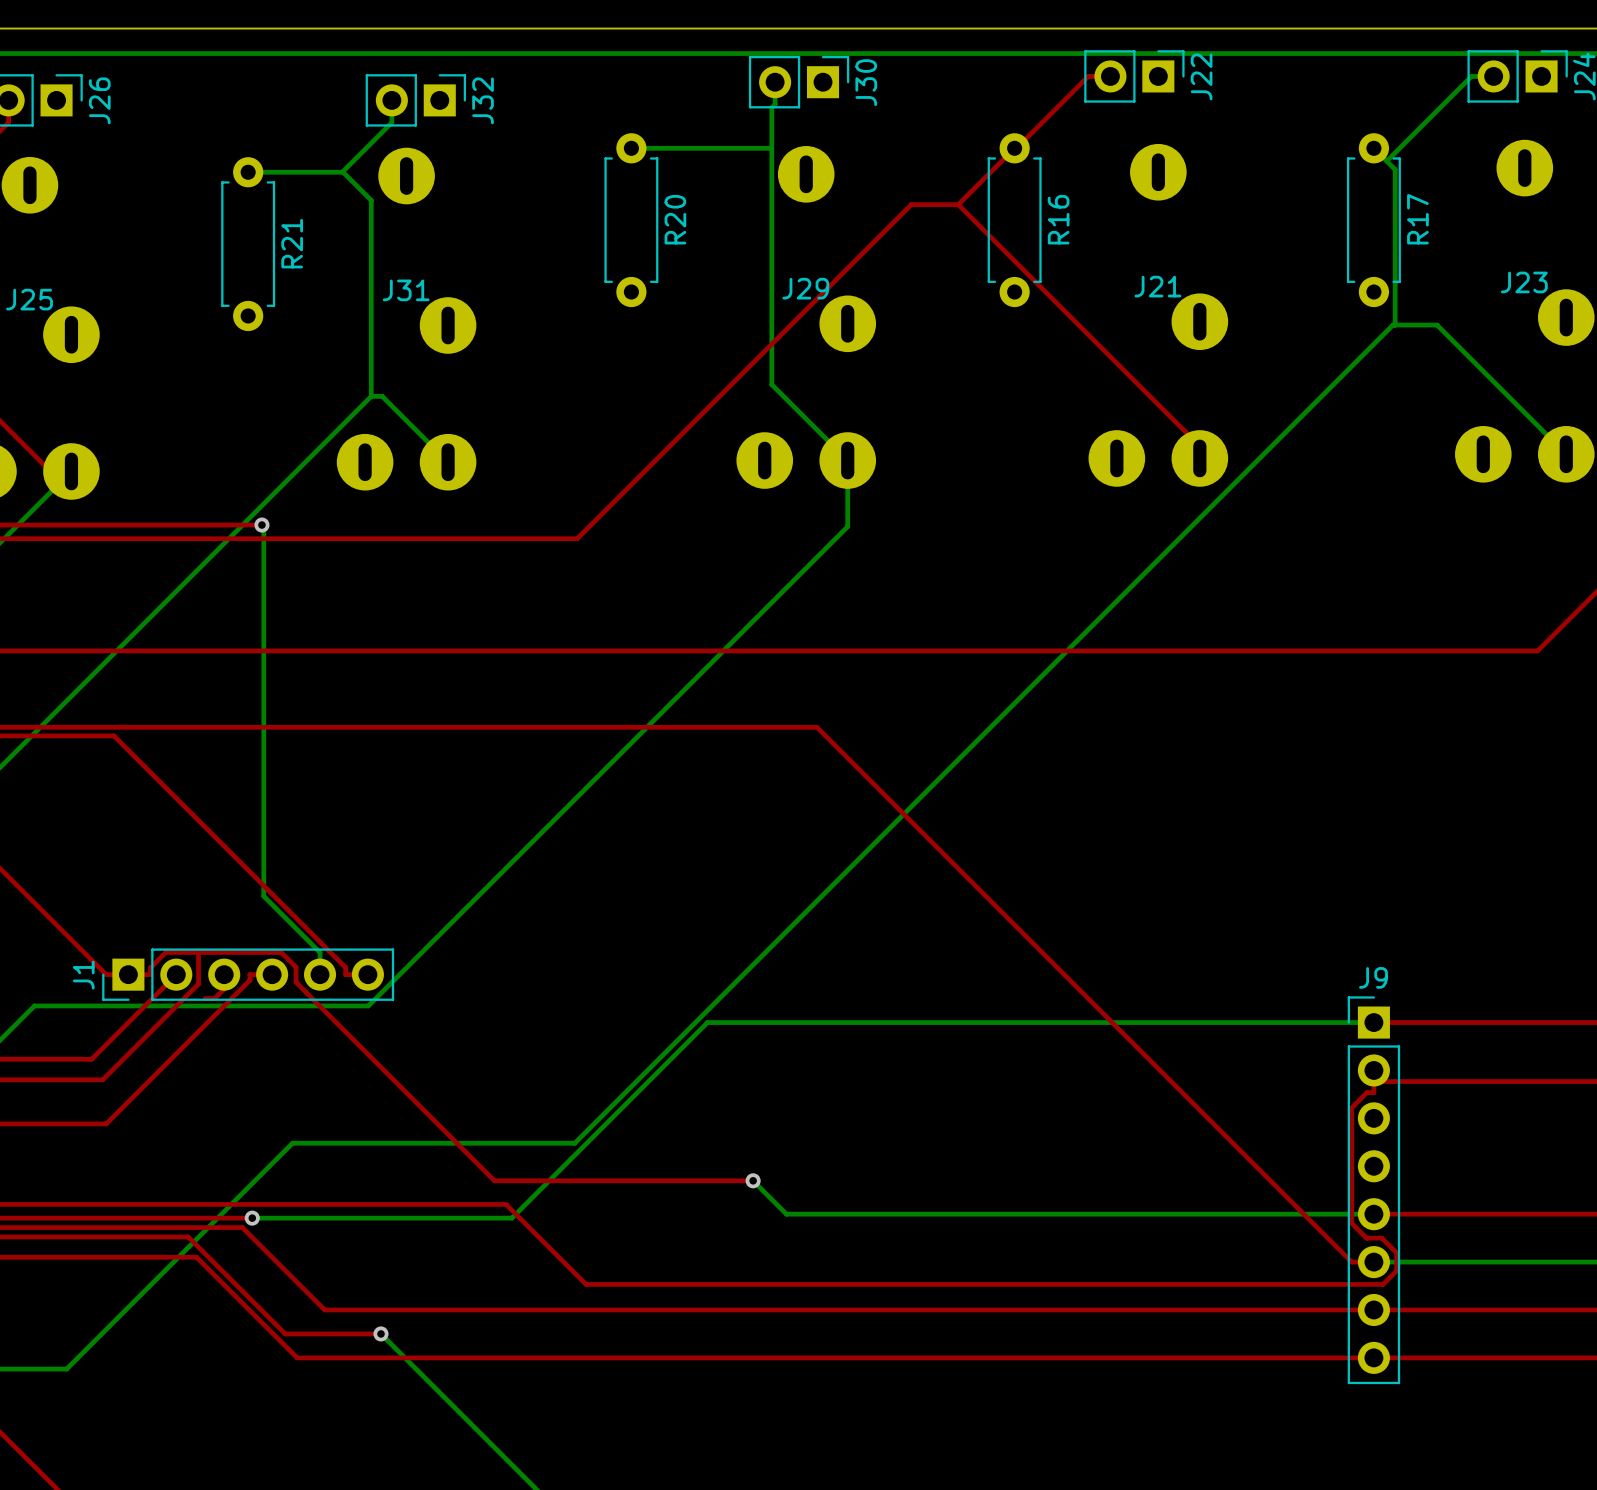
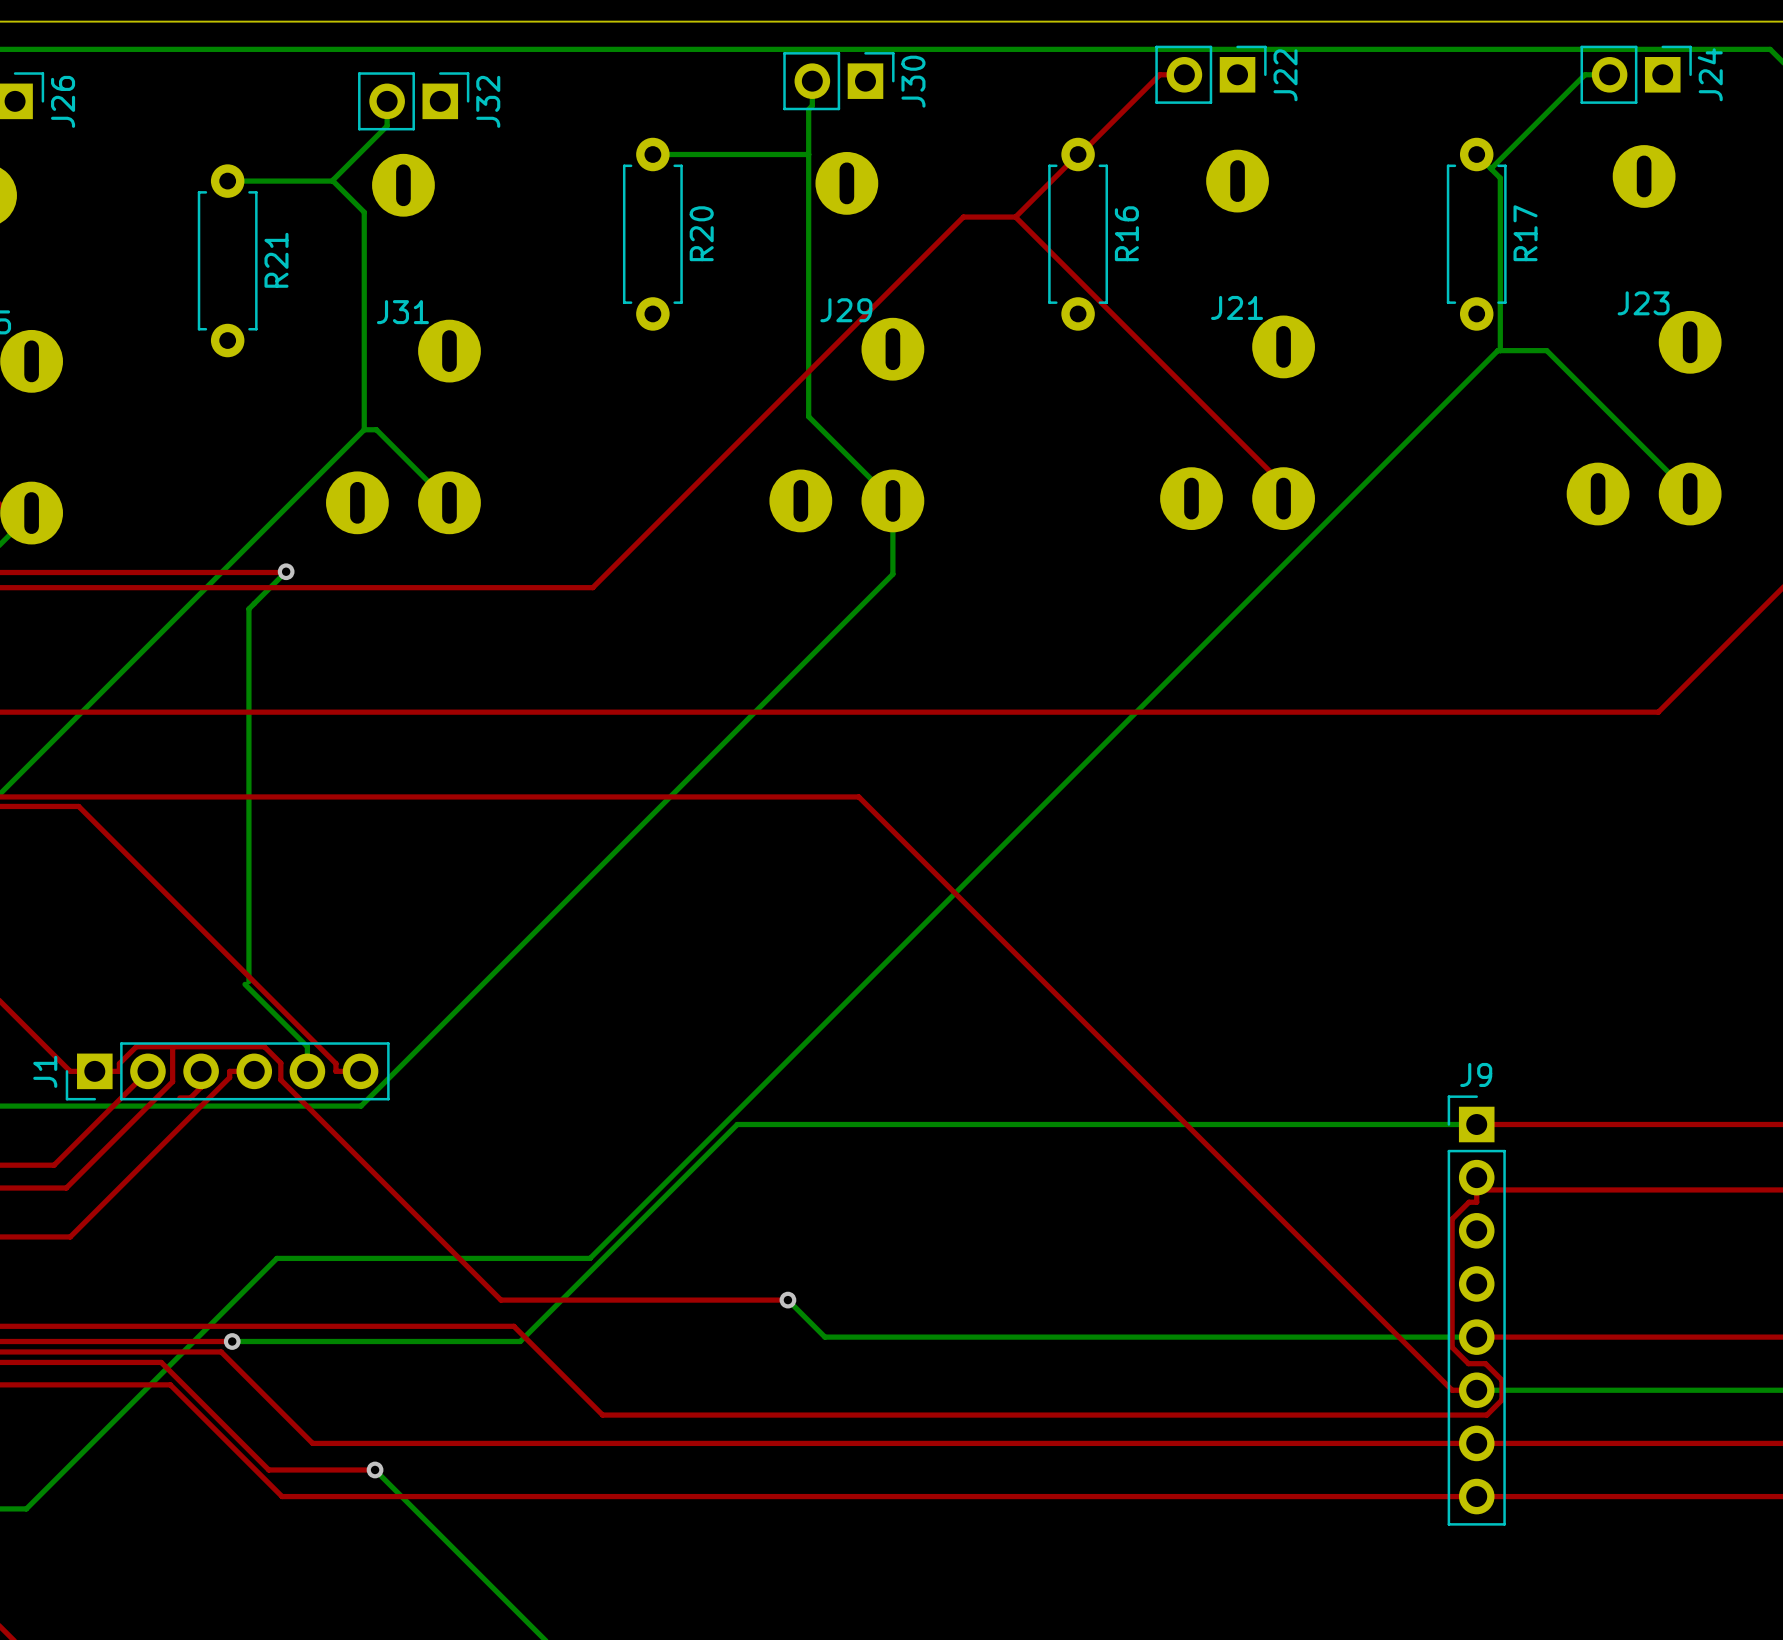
top track: none -> (286, 571) (242, 572)
bottom track: none -> (286, 571) (248, 608) (248, 981)
bottom track: (261, 525) (263, 526) (263, 896) -> none
via position: (261, 525) -> (286, 571)

